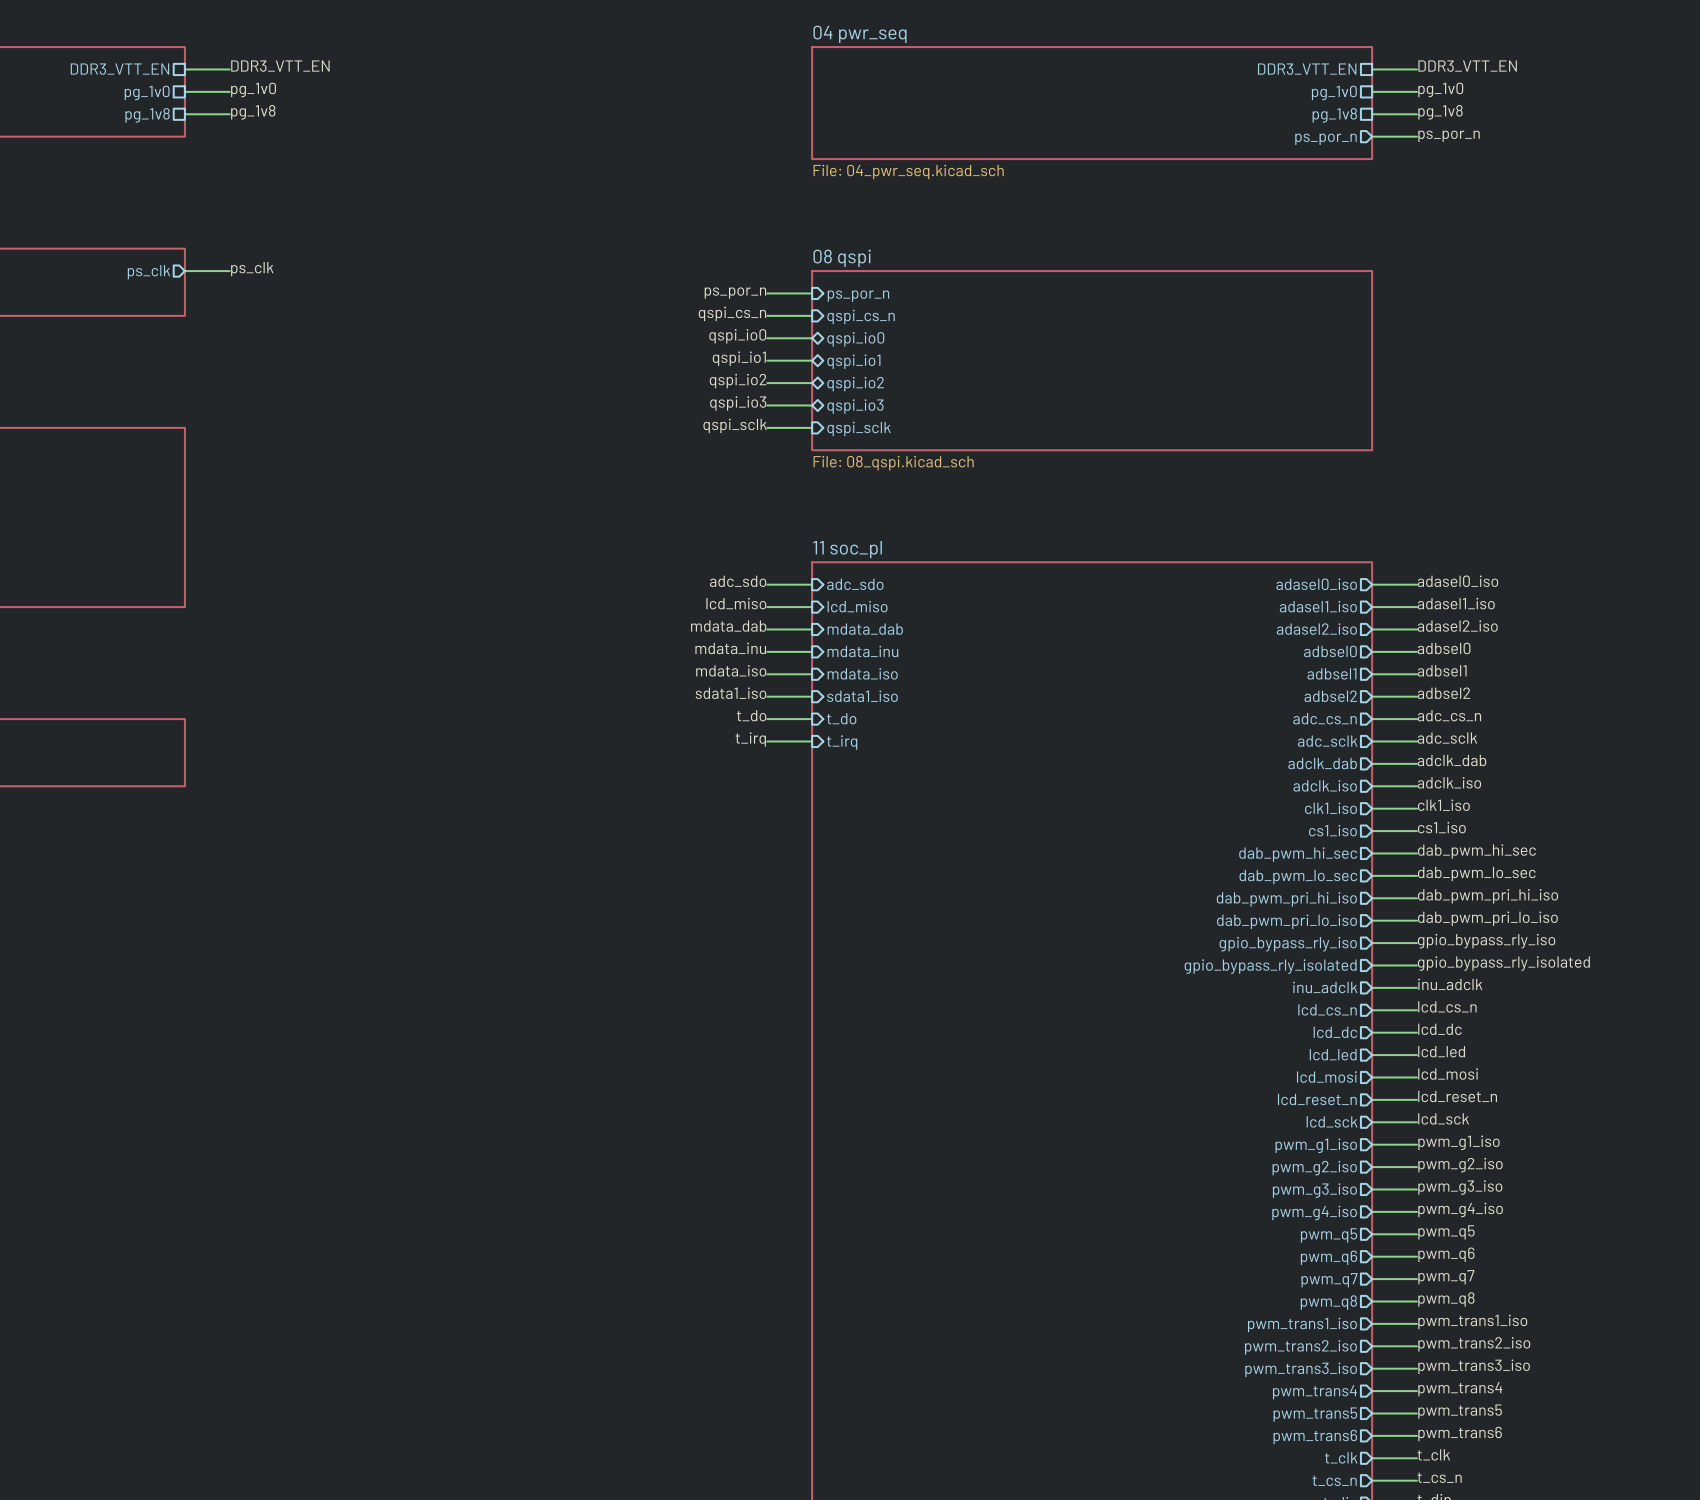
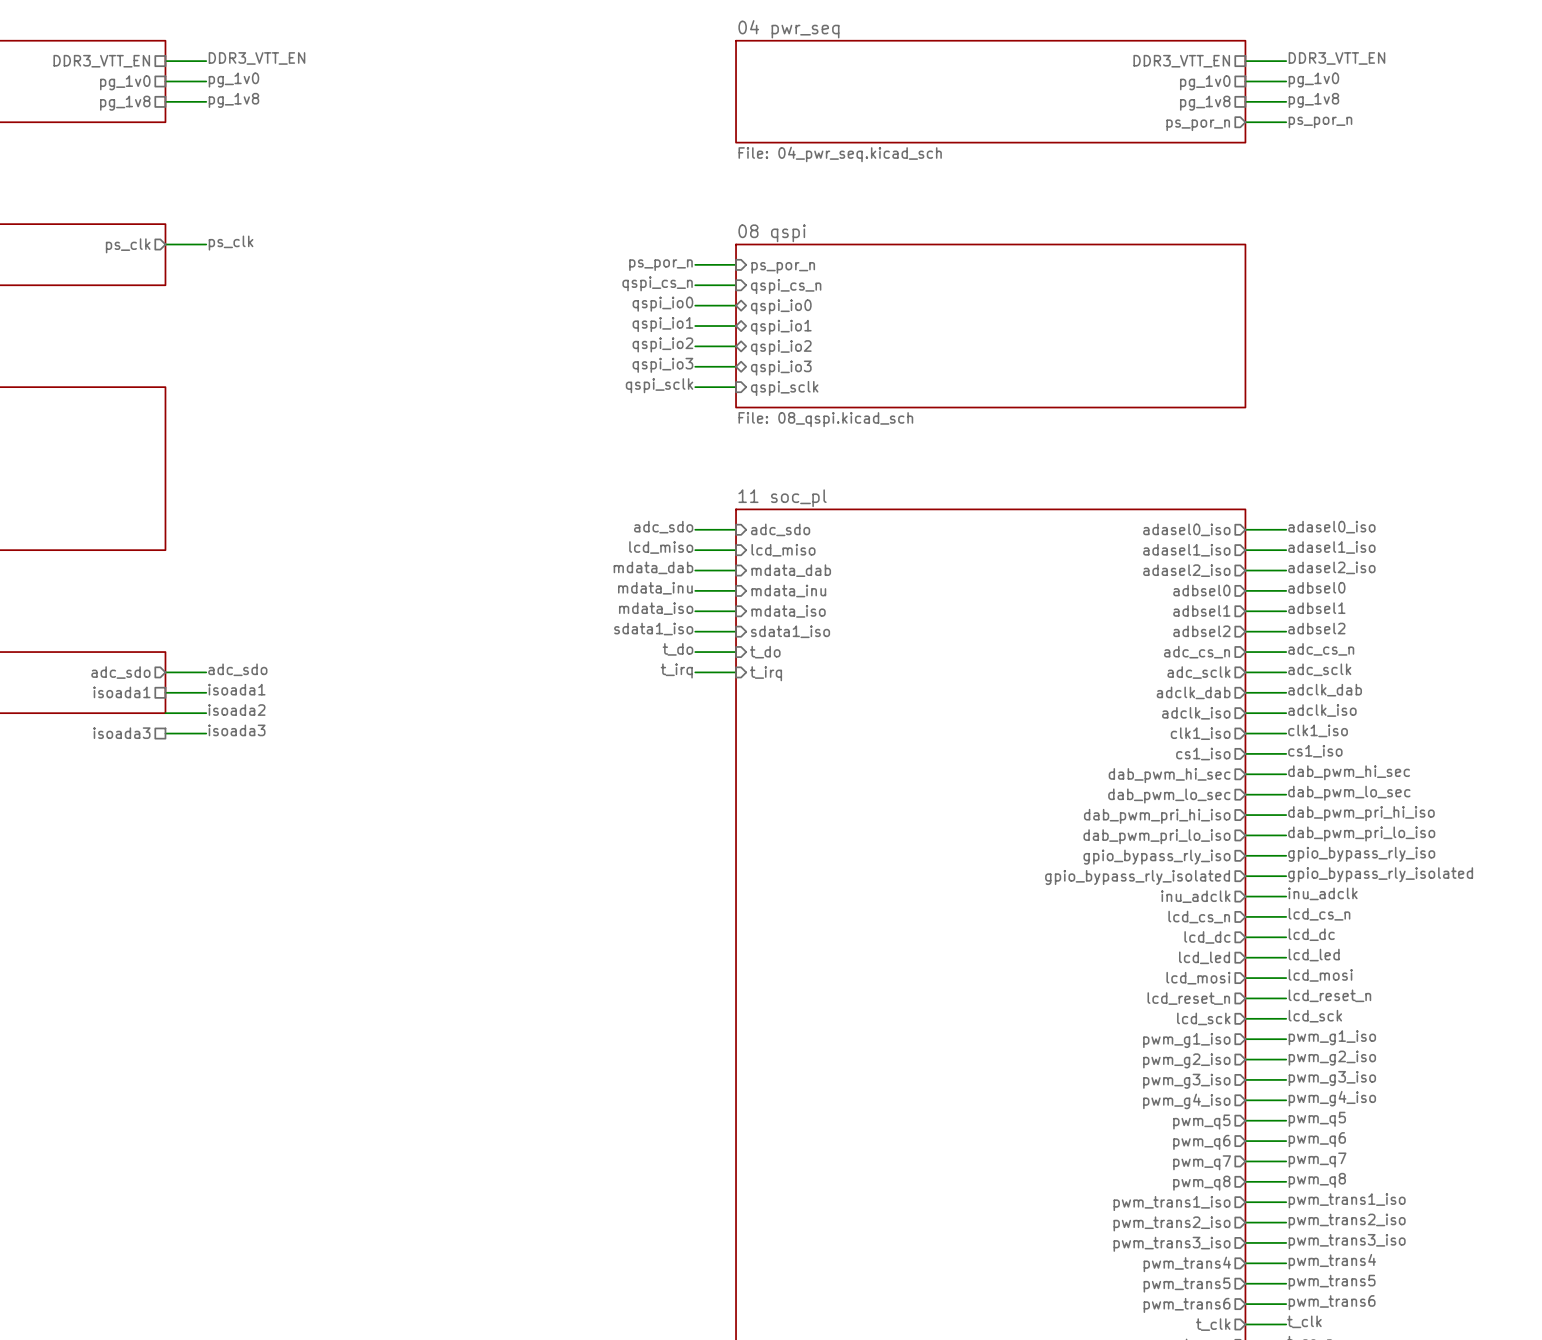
label: none -> adc_sdo (237, 669)
sheet pin: none -> adc_sdo (120, 672)
wire: none -> (165, 672) (206, 672)
label: none -> isoada1 (236, 689)
sheet pin: none -> isoada1 (121, 692)
wire: none -> (165, 692) (206, 692)
label: none -> isoada2 (236, 710)
wire: none -> (165, 713) (206, 713)
label: none -> isoada3 (236, 730)
sheet pin: none -> isoada3 (121, 733)
wire: none -> (165, 733) (206, 733)

